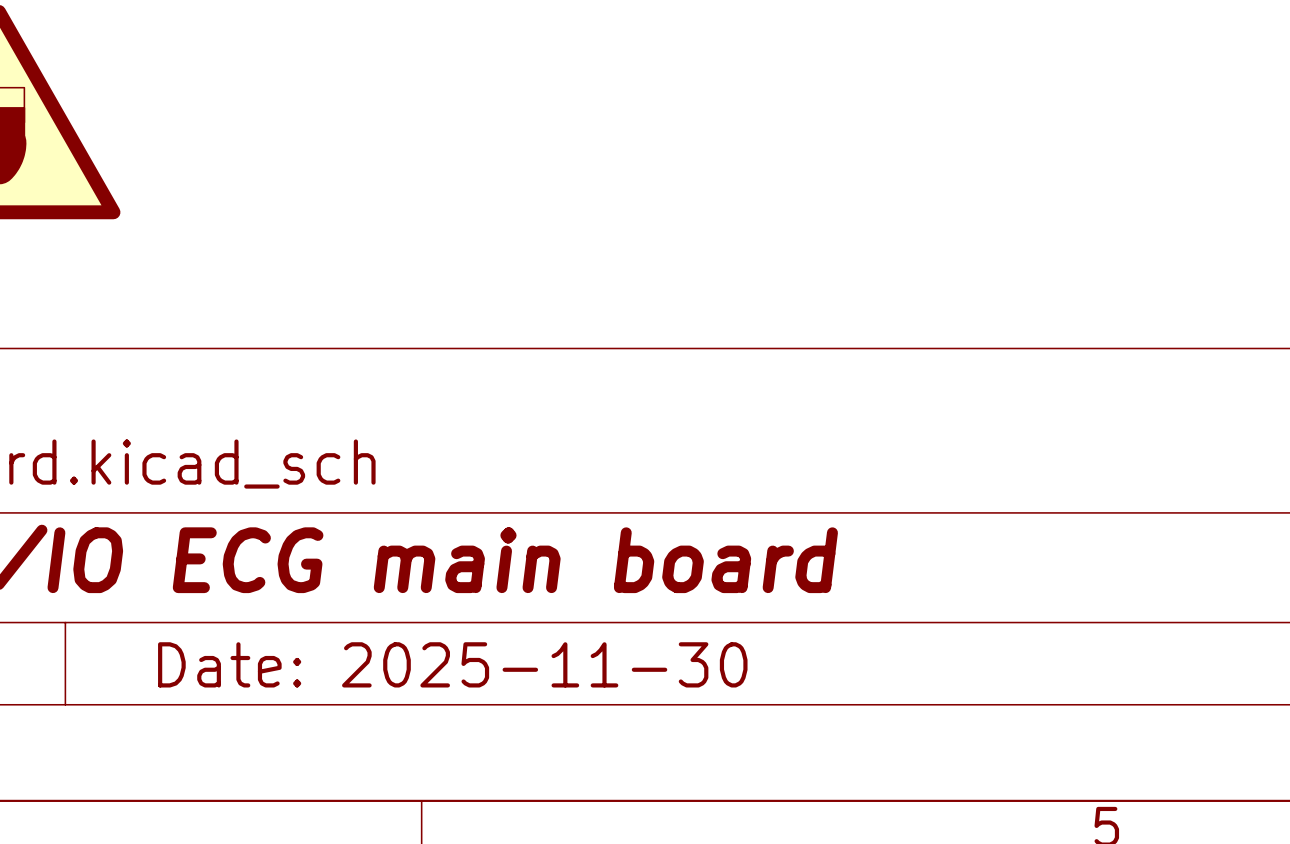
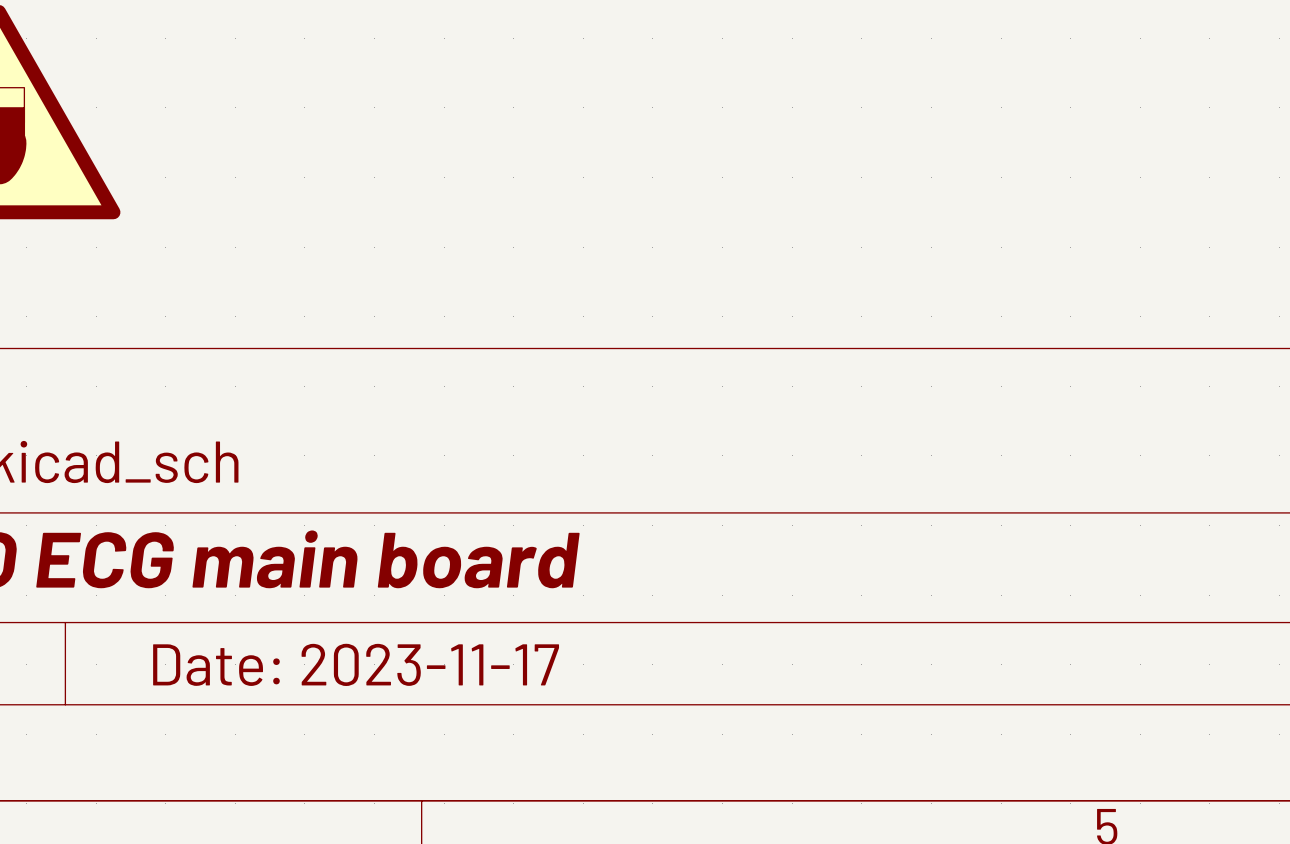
title block: Date: 2025-11-30 (452, 664) -> Date: 2023-11-17 (356, 664)

